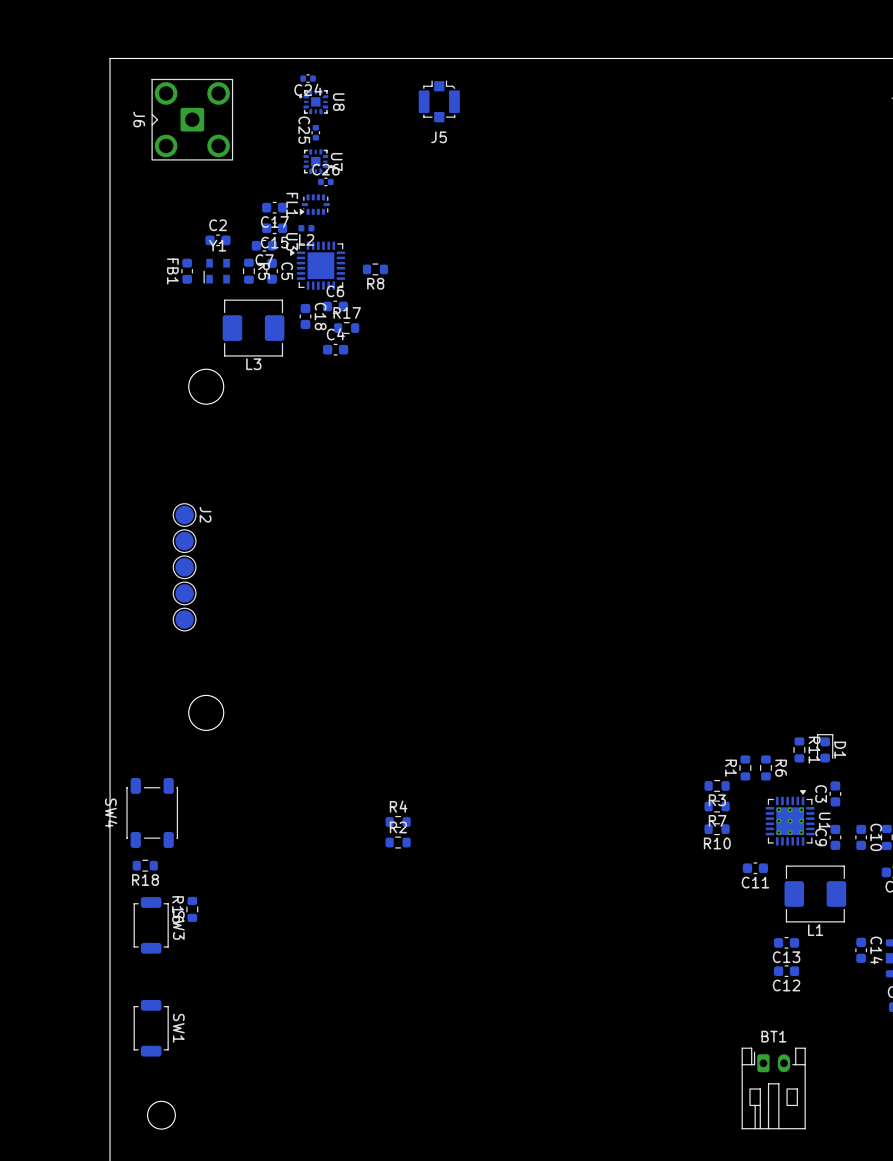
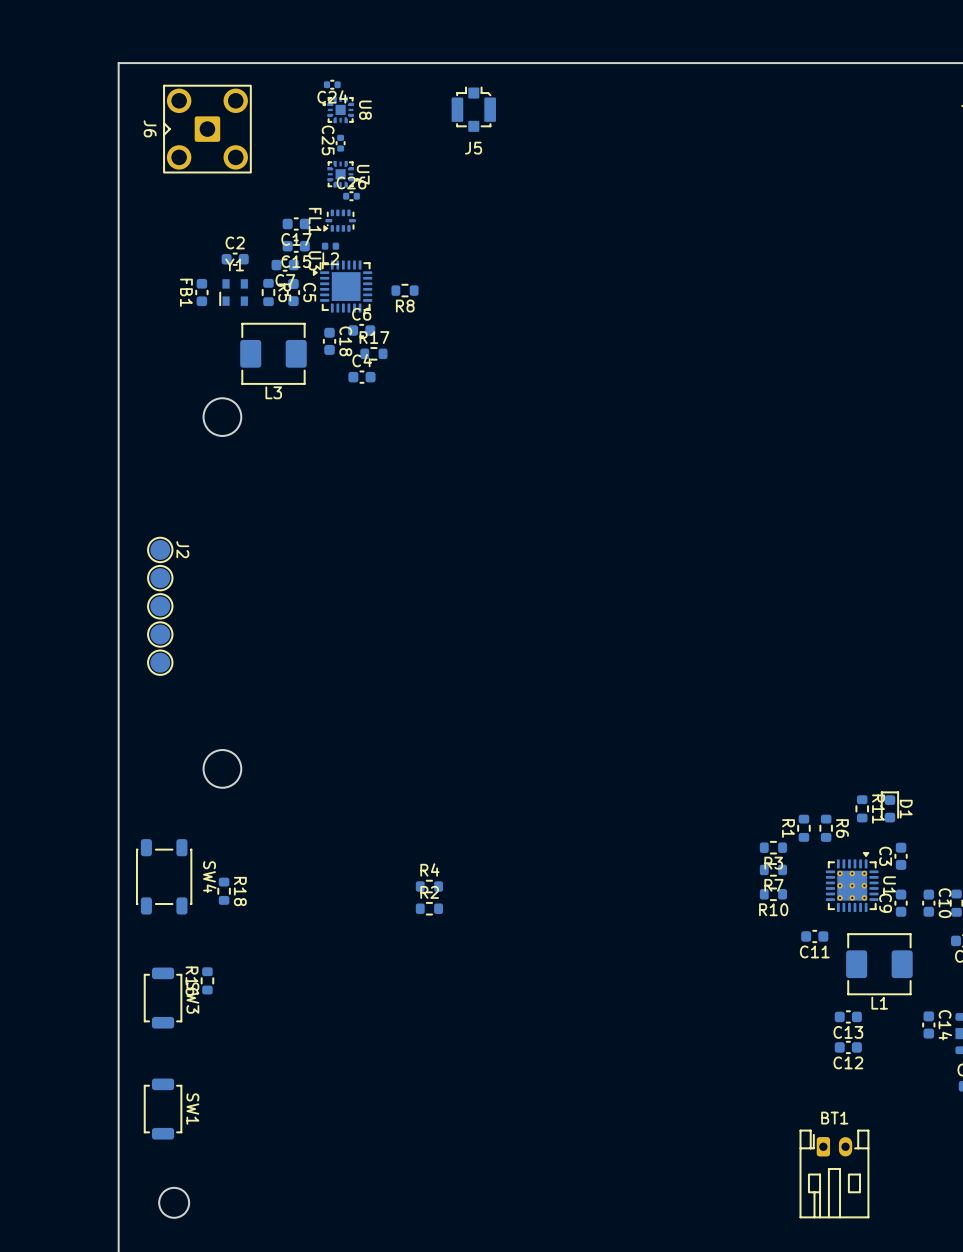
J2 position: (184, 567) -> (160, 606)
SW4 name position: SW4 (111, 813) -> SW4 (209, 877)
R18 rotation: 0° (145, 865) -> 90° clockwise (224, 891)
R18 position: (145, 865) -> (224, 891)
R18 name position: R18 (145, 880) -> R18 (240, 891)

